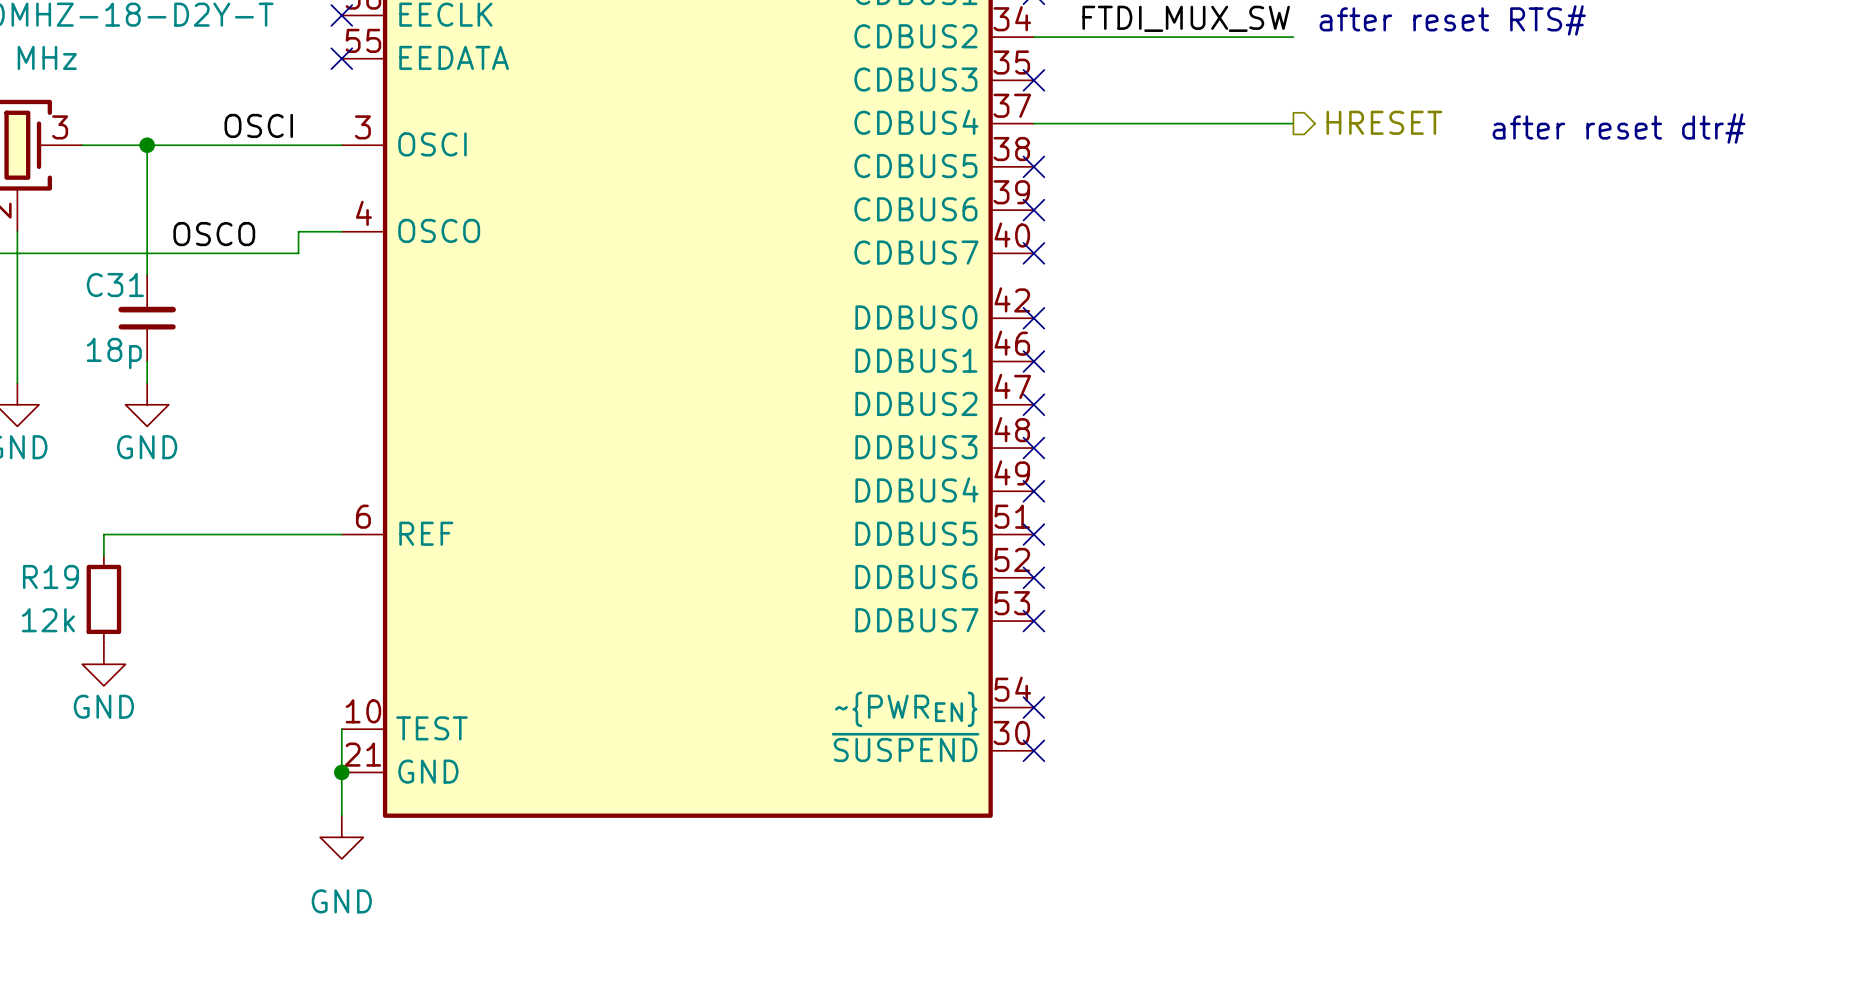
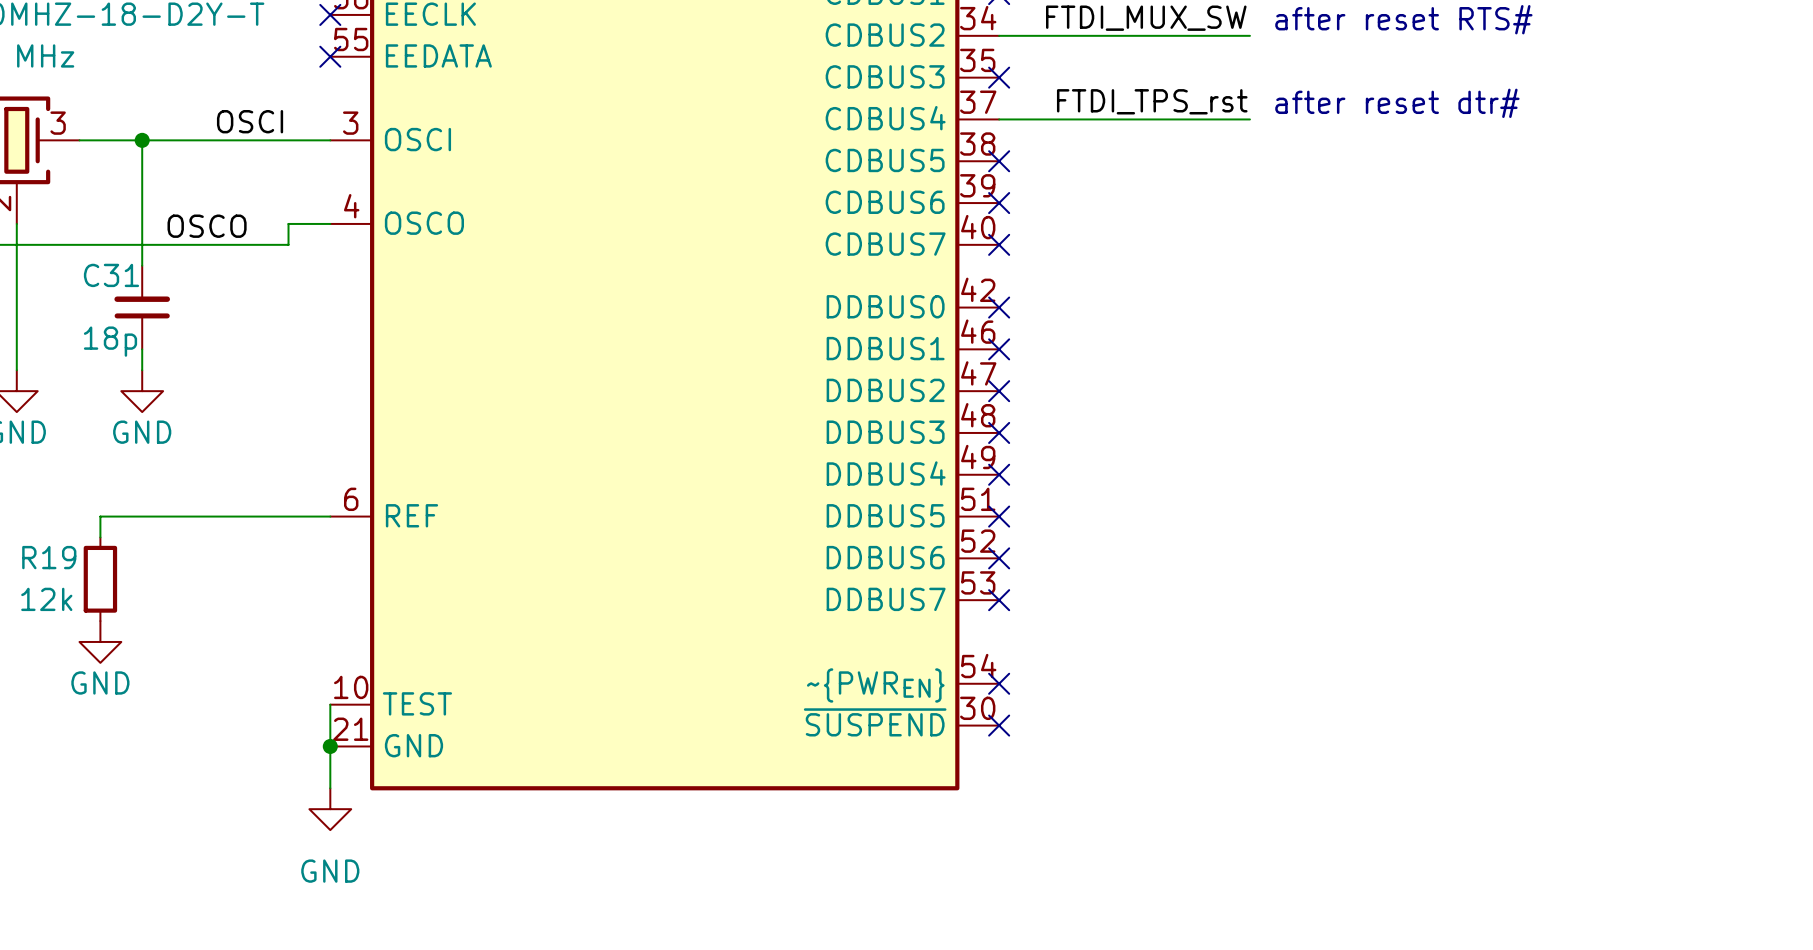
label: none -> FTDI_TPS_rst (1152, 101)
hierarchical label: HRESET (1384, 122) -> none
text position: after reset dtr# (1619, 128) -> after reset dtr# (1397, 103)

